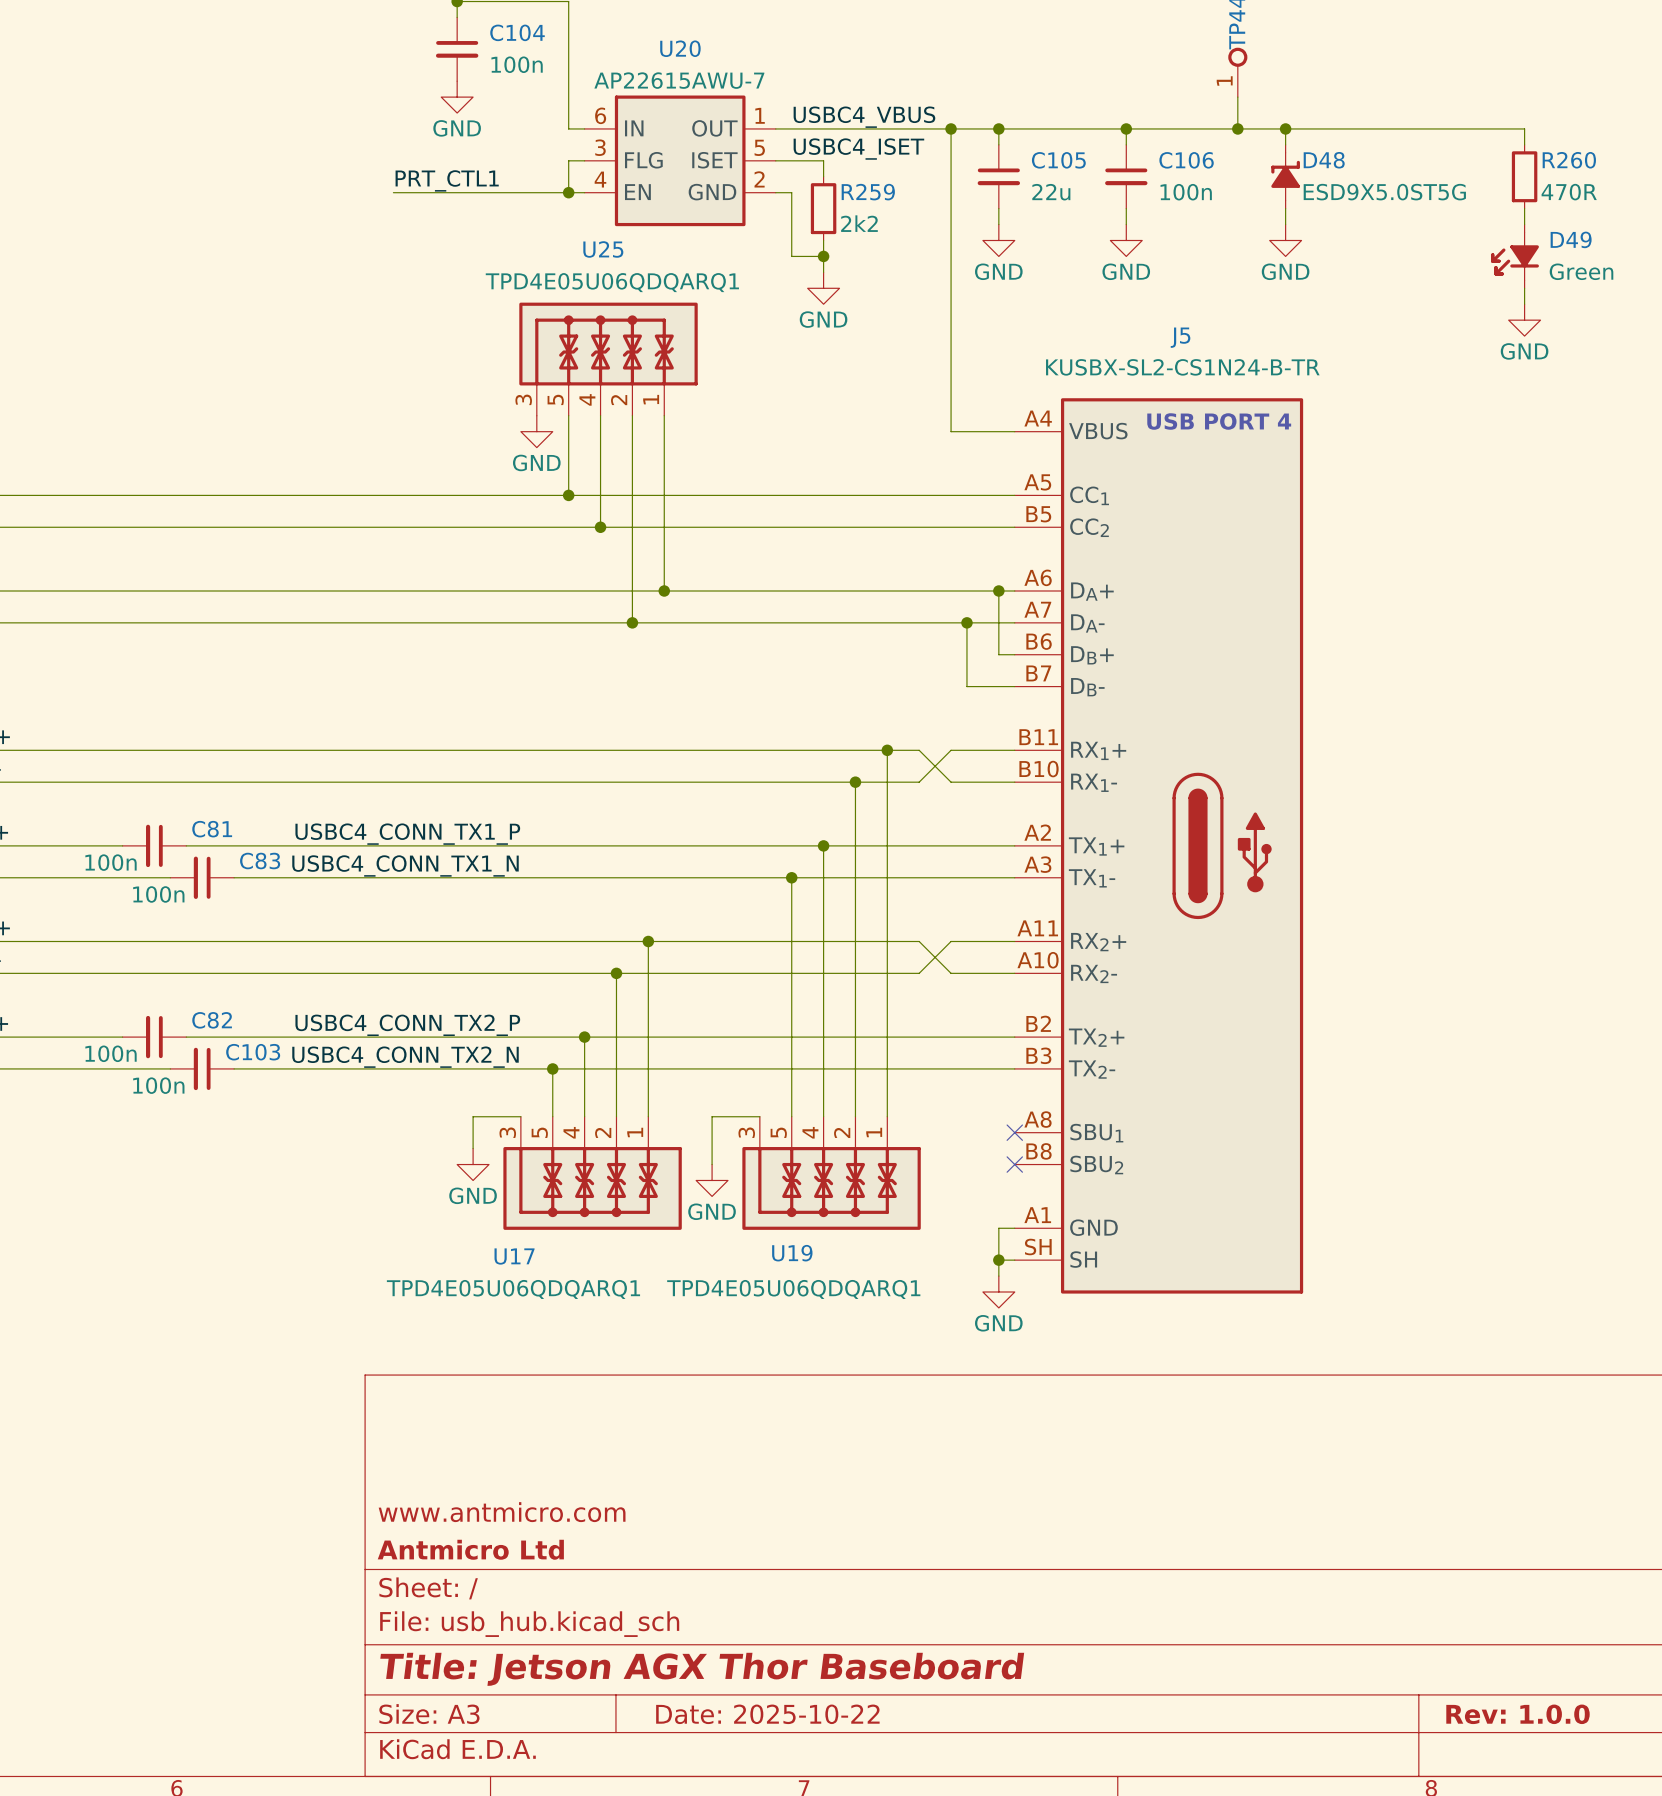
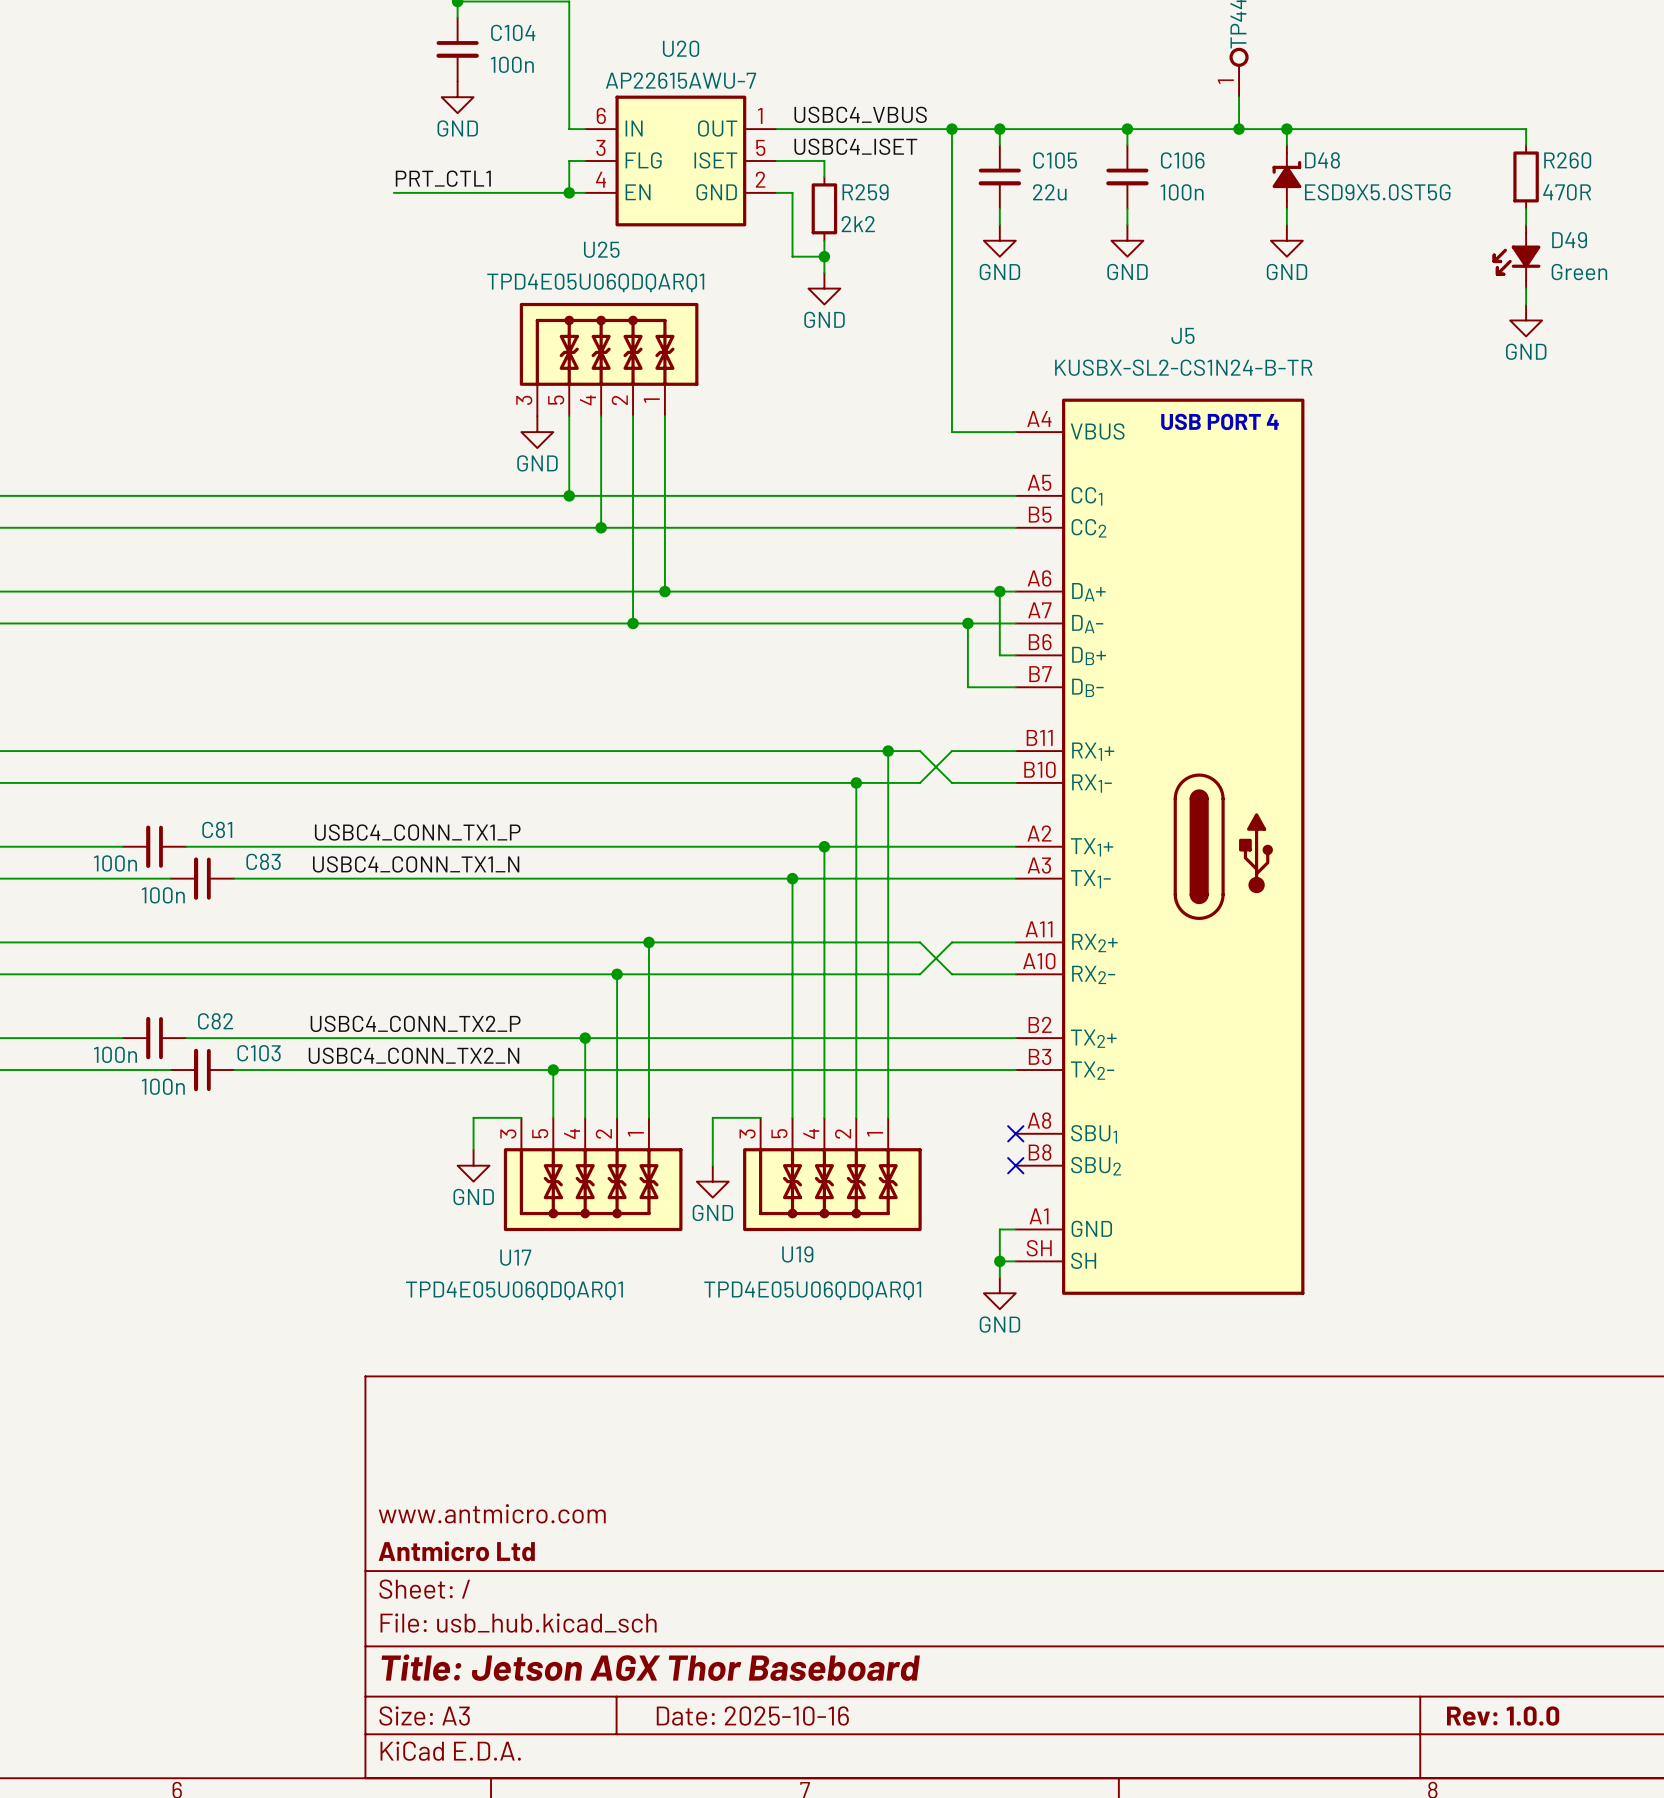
title block: Date: 2025-10-22 (767, 1714) -> Date: 2025-10-16 (752, 1716)

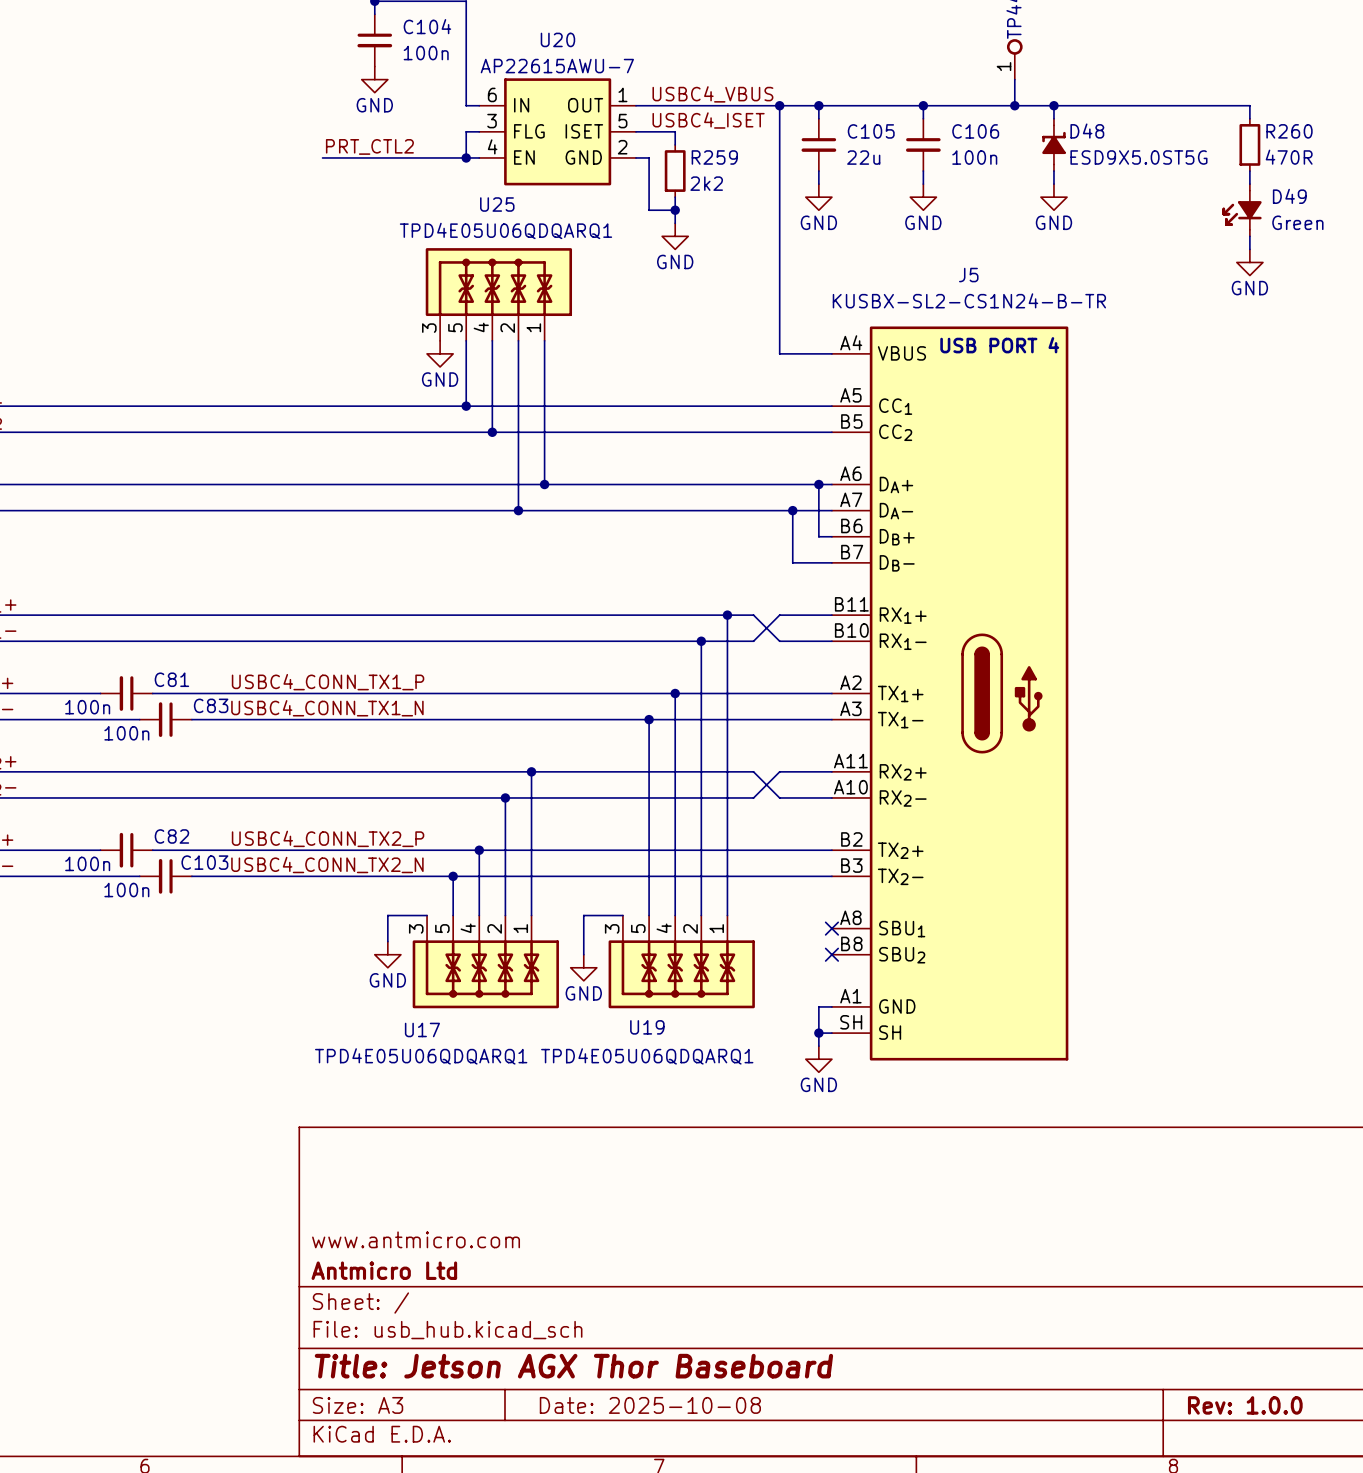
label: PRT_CTL1 (443, 178) -> PRT_CTL2 (369, 146)
title block: Date: 2025-10-16 (752, 1716) -> Date: 2025-10-08 (650, 1405)

